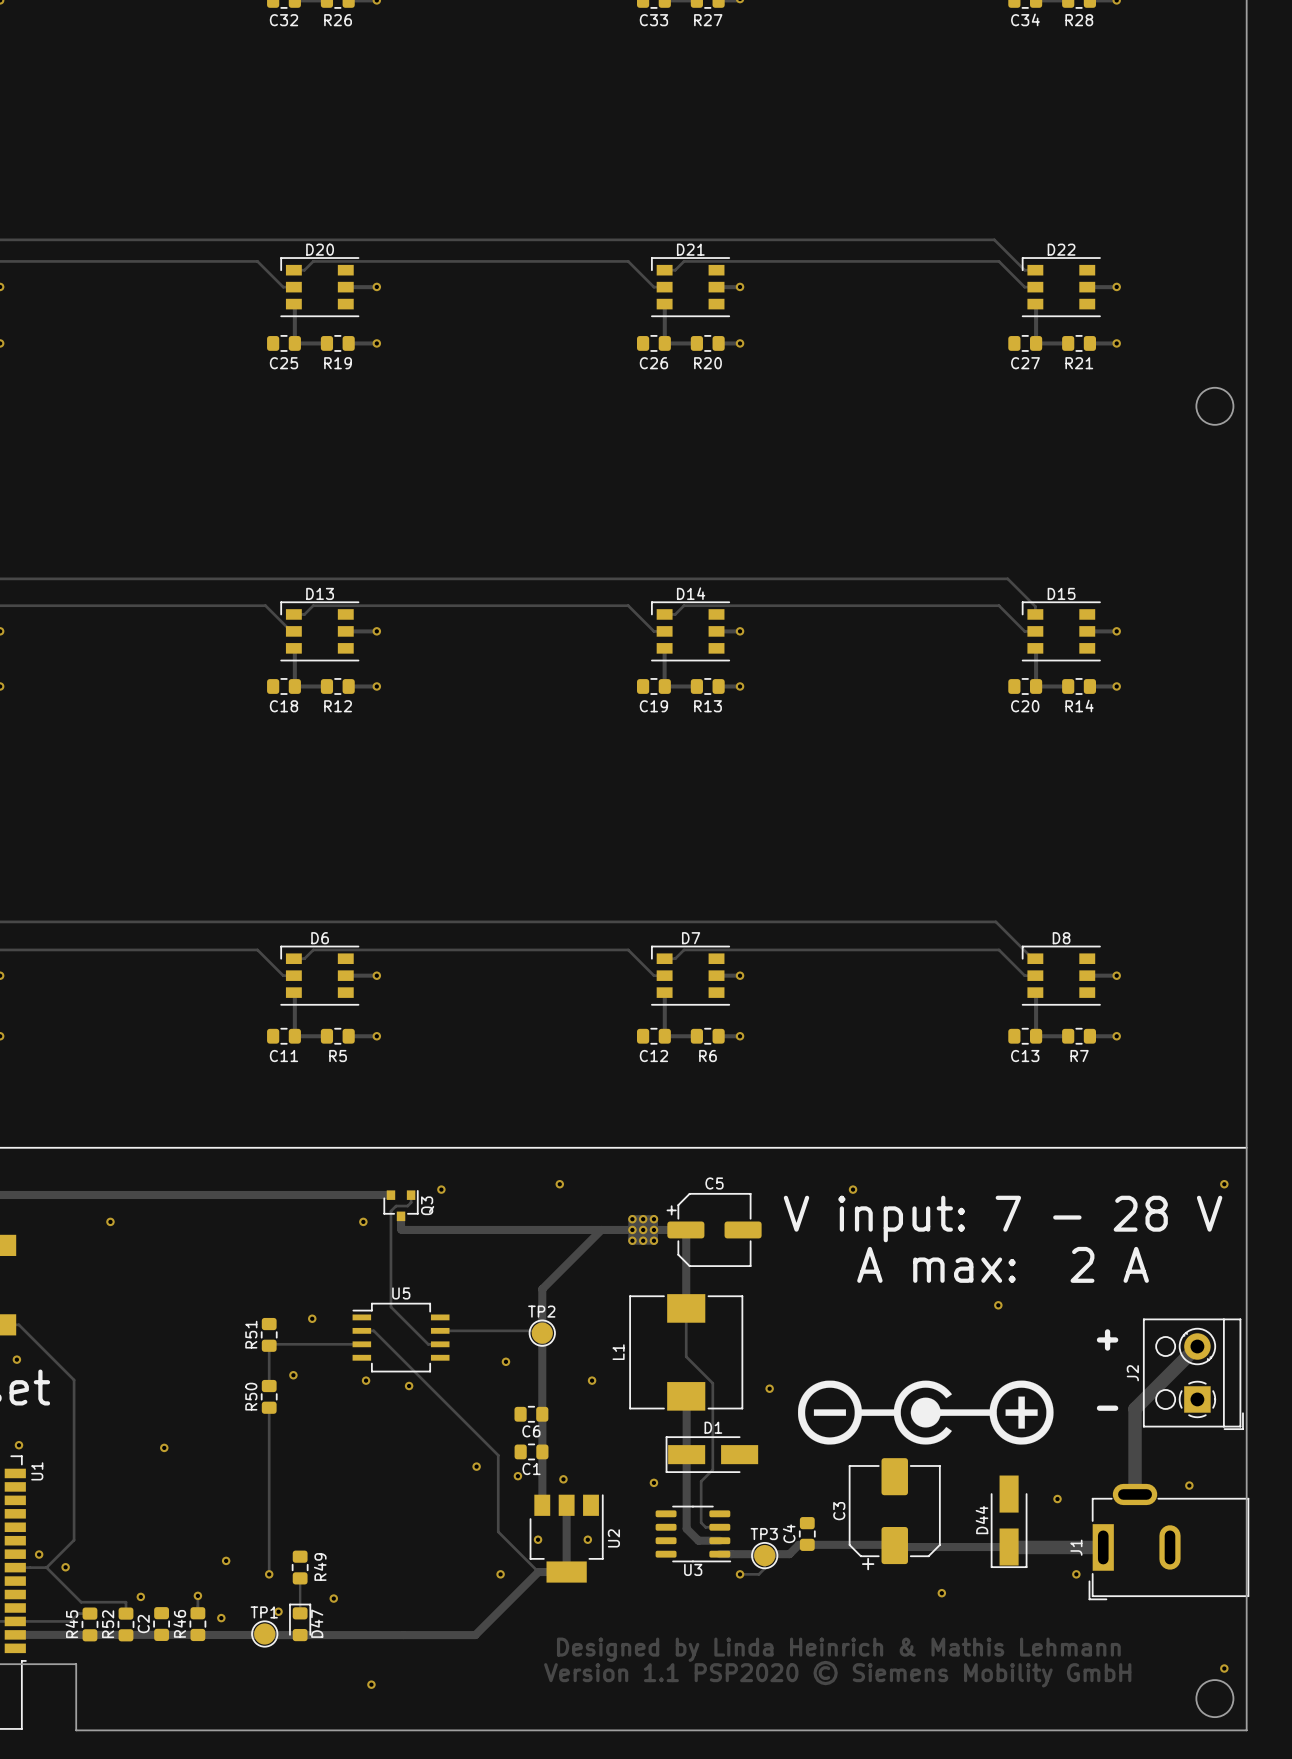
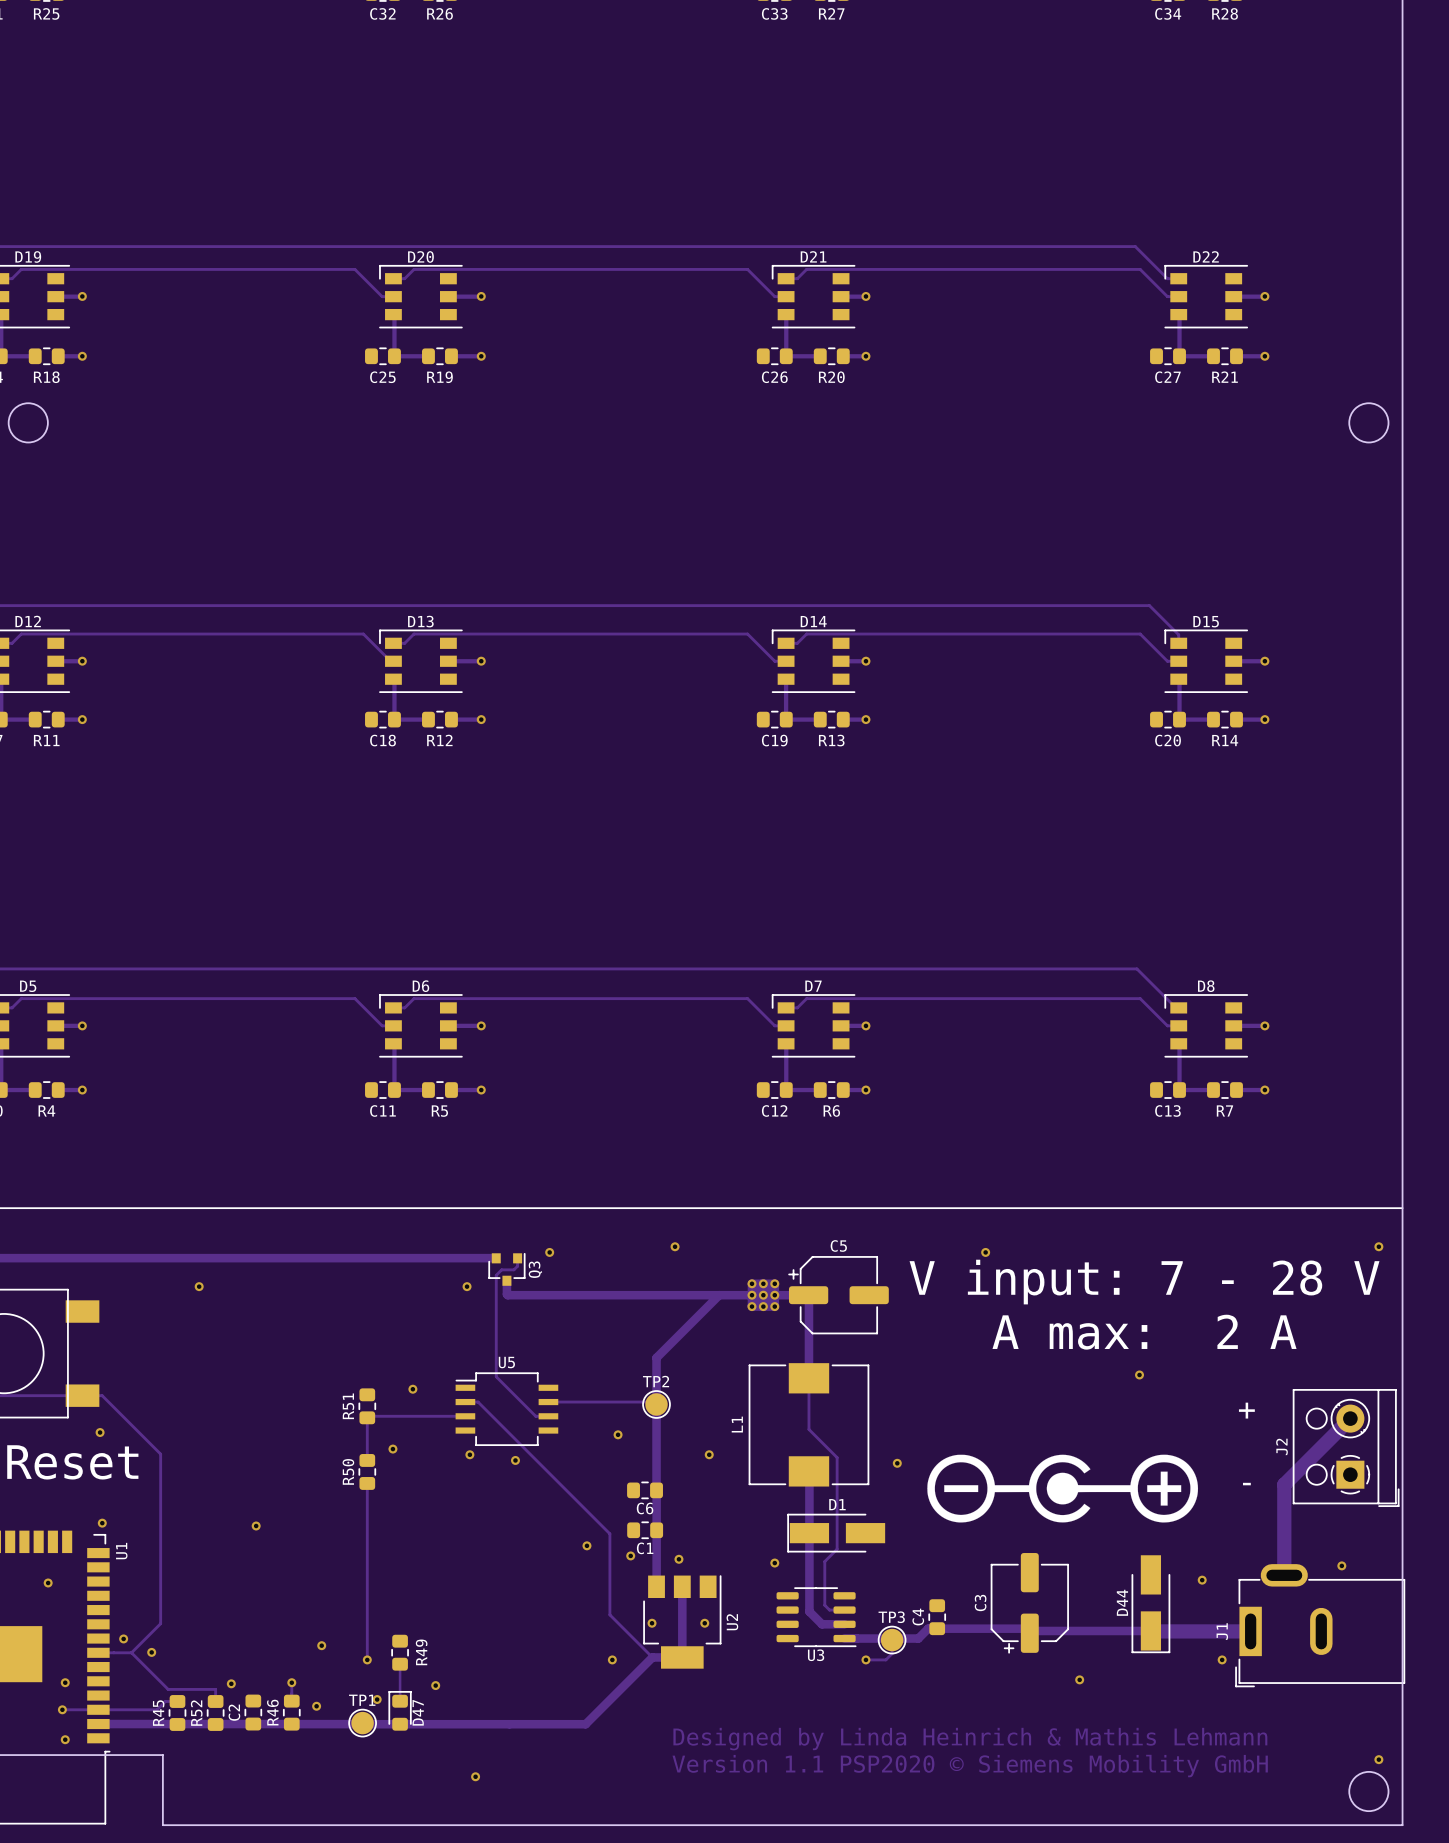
C3 footprint: [848, 1458, 941, 1571] -> [990, 1553, 1069, 1654]

